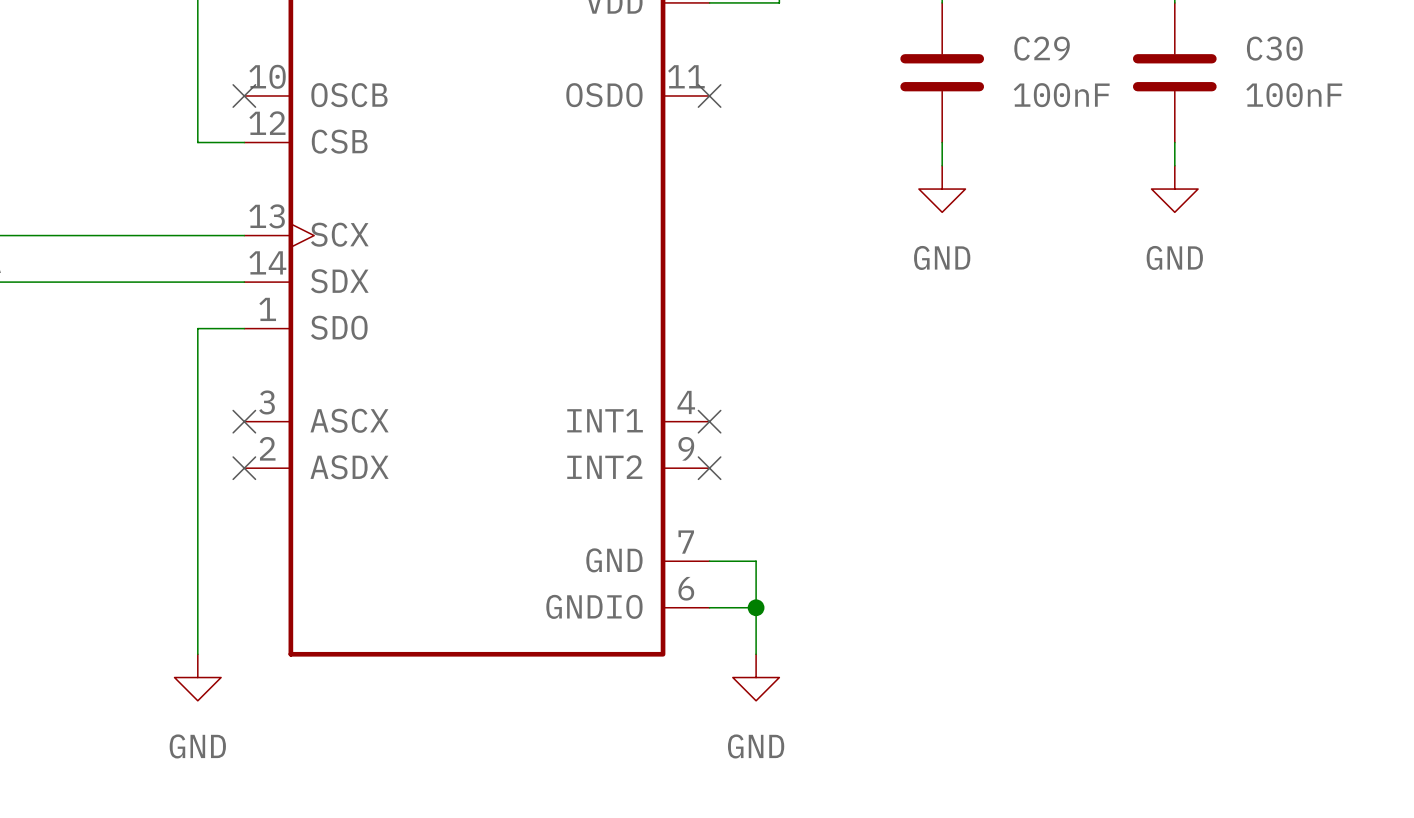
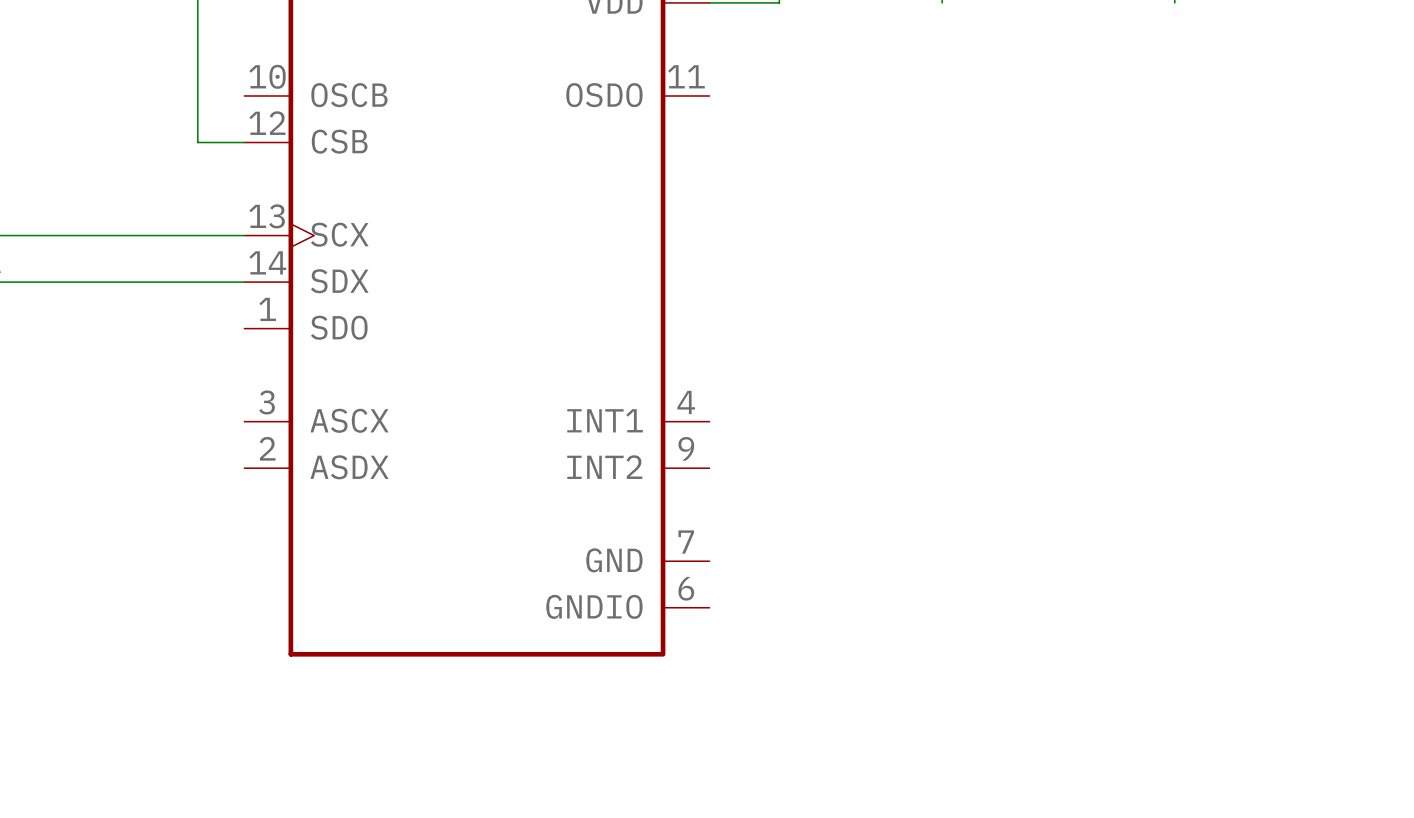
C29: 100nF (942, 72) -> none
C30: 100nF (1174, 72) -> none
no-connect mark: (244, 96) -> none
no-connect mark: (709, 96) -> none
wire: (942, 142) (942, 165) -> none
wire: (1174, 142) (1174, 165) -> none
power symbol: GND (942, 189) -> none
power symbol: GND (1174, 189) -> none
wire: (244, 328) (197, 328) (197, 654) -> none
no-connect mark: (244, 421) -> none
no-connect mark: (709, 421) -> none
no-connect mark: (244, 468) -> none
no-connect mark: (709, 468) -> none
wire: (709, 561) (756, 561) (756, 654) -> none
wire: (709, 607) (756, 607) -> none
junction: (756, 607) -> none
power symbol: GND (197, 677) -> none
power symbol: GND (756, 677) -> none

